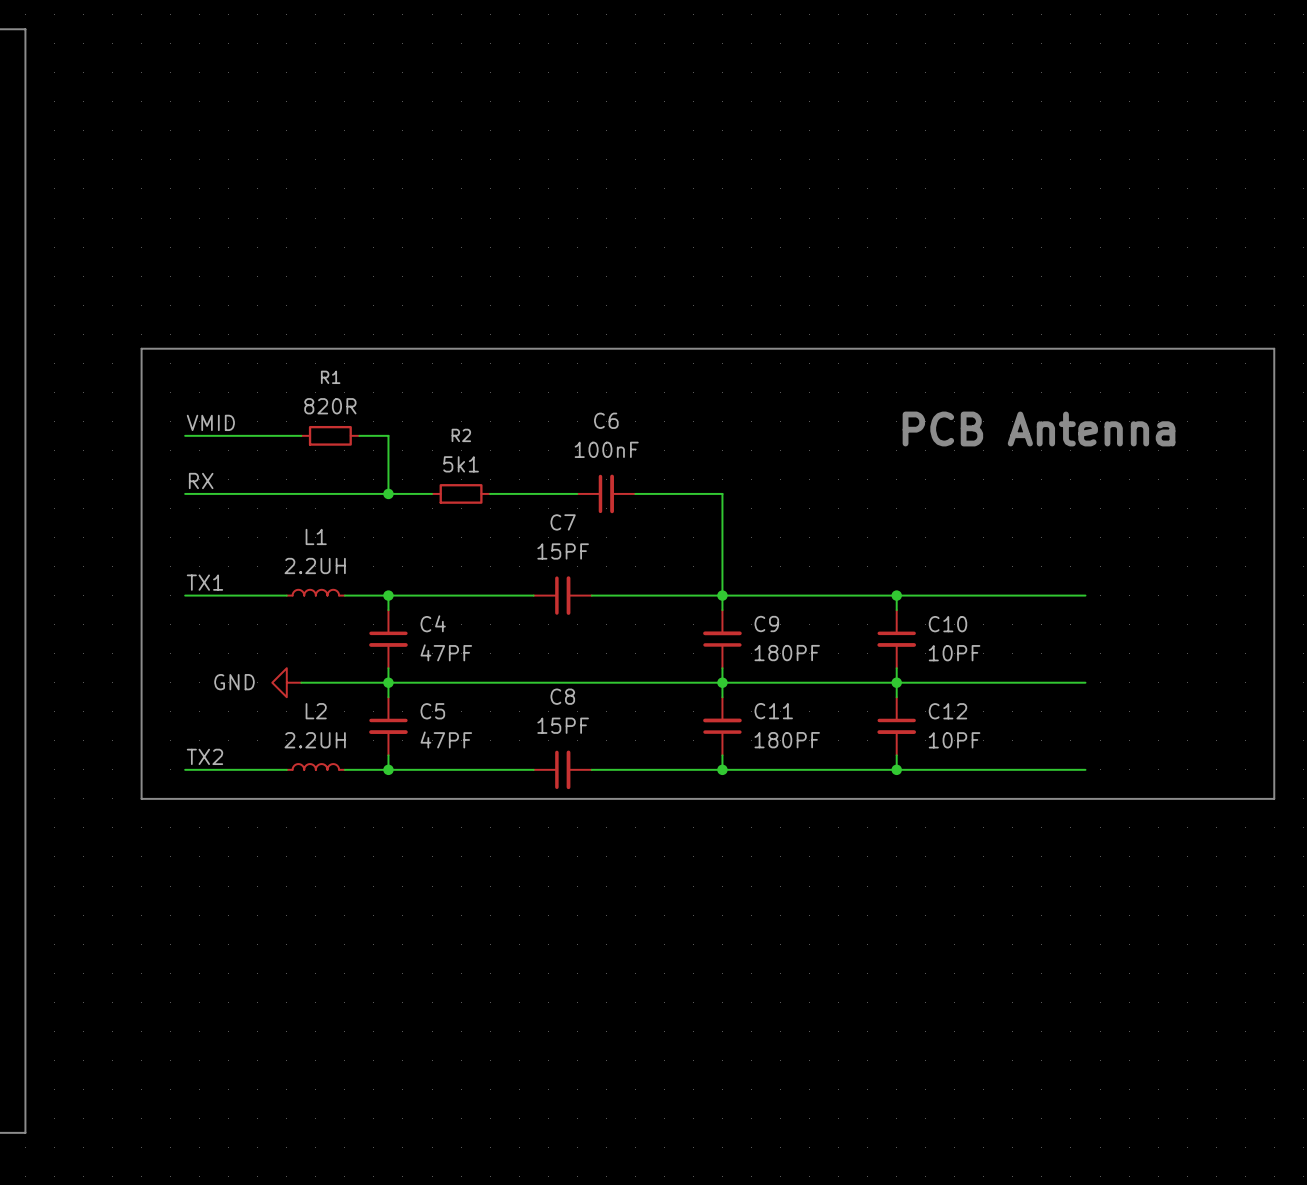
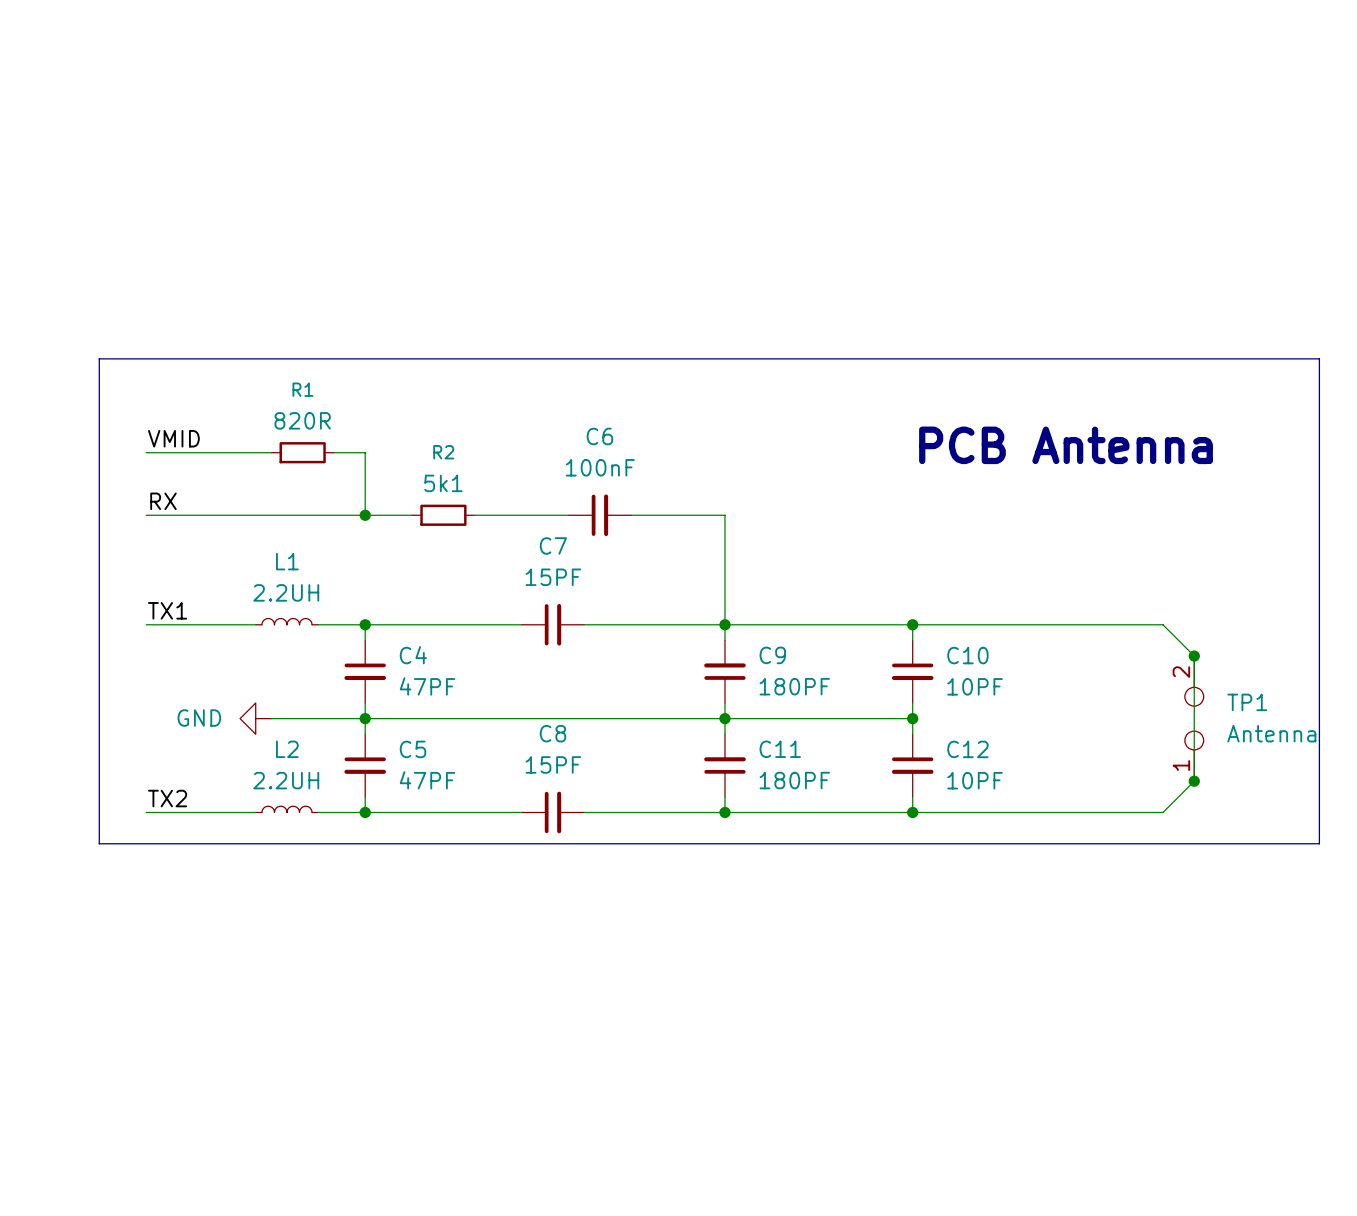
wire: none -> (1116, 624) (1162, 624) (1194, 656) (1194, 781) (1162, 812) (1116, 812)
junction: none -> (1194, 656)
wire: (896, 682) (1085, 682) -> none
TP1: none -> Antenna (1194, 718)
junction: none -> (1194, 781)

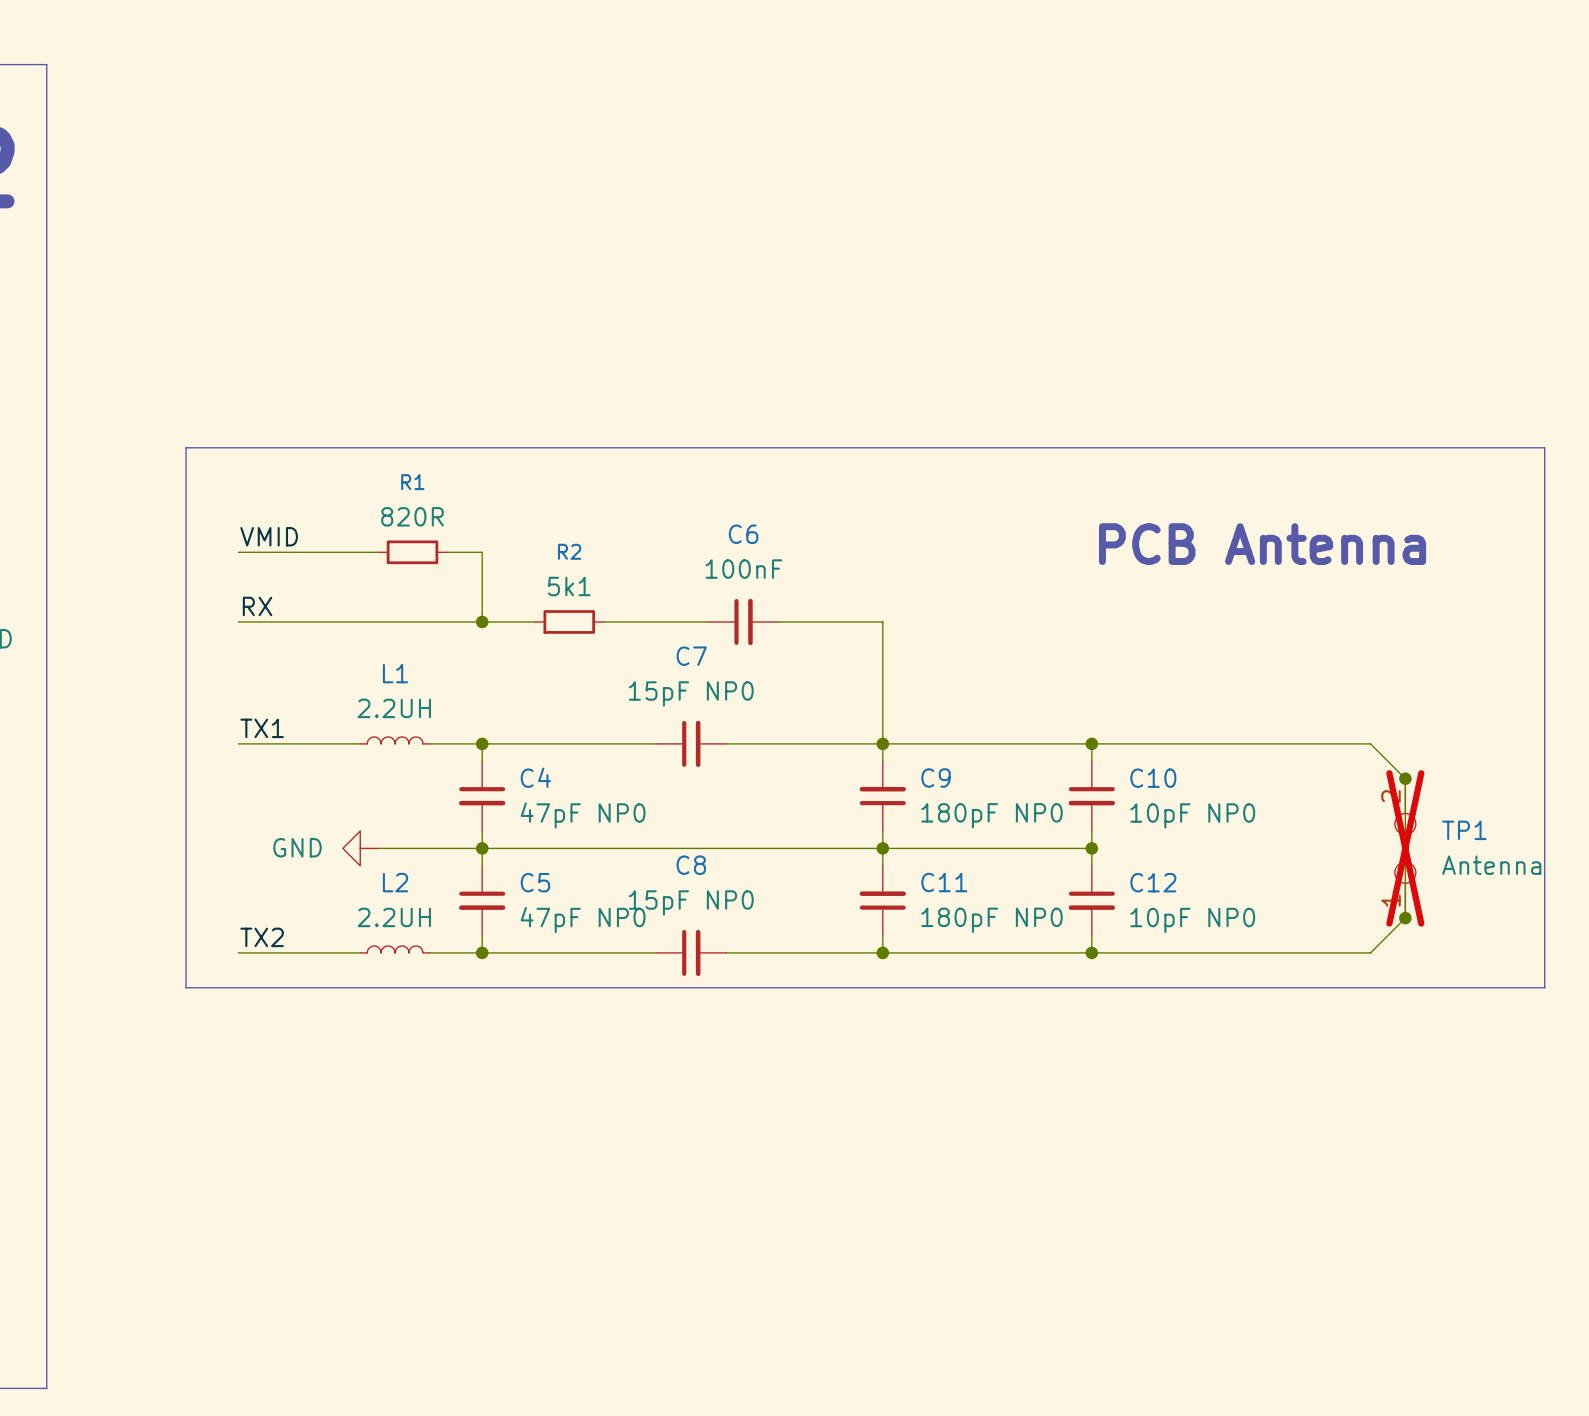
C7 value: 15PF (553, 577) -> 15pF NP0 (691, 693)
C4 value: 47PF (427, 686) -> 47pF NP0 (583, 815)
C9 value: 180PF (794, 686) -> 180pF NP0 (992, 815)
C10 value: 10PF (975, 686) -> 10pF NP0 (1192, 815)
TP1 do-not-place cross: none -> (1405, 848)
C8 value: 15PF (553, 764) -> 15pF NP0 (691, 902)
C5 value: 47PF (427, 780) -> 47pF NP0 (583, 920)
C11 value: 180PF (794, 780) -> 180pF NP0 (992, 920)
C12 value: 10PF (975, 780) -> 10pF NP0 (1192, 920)

